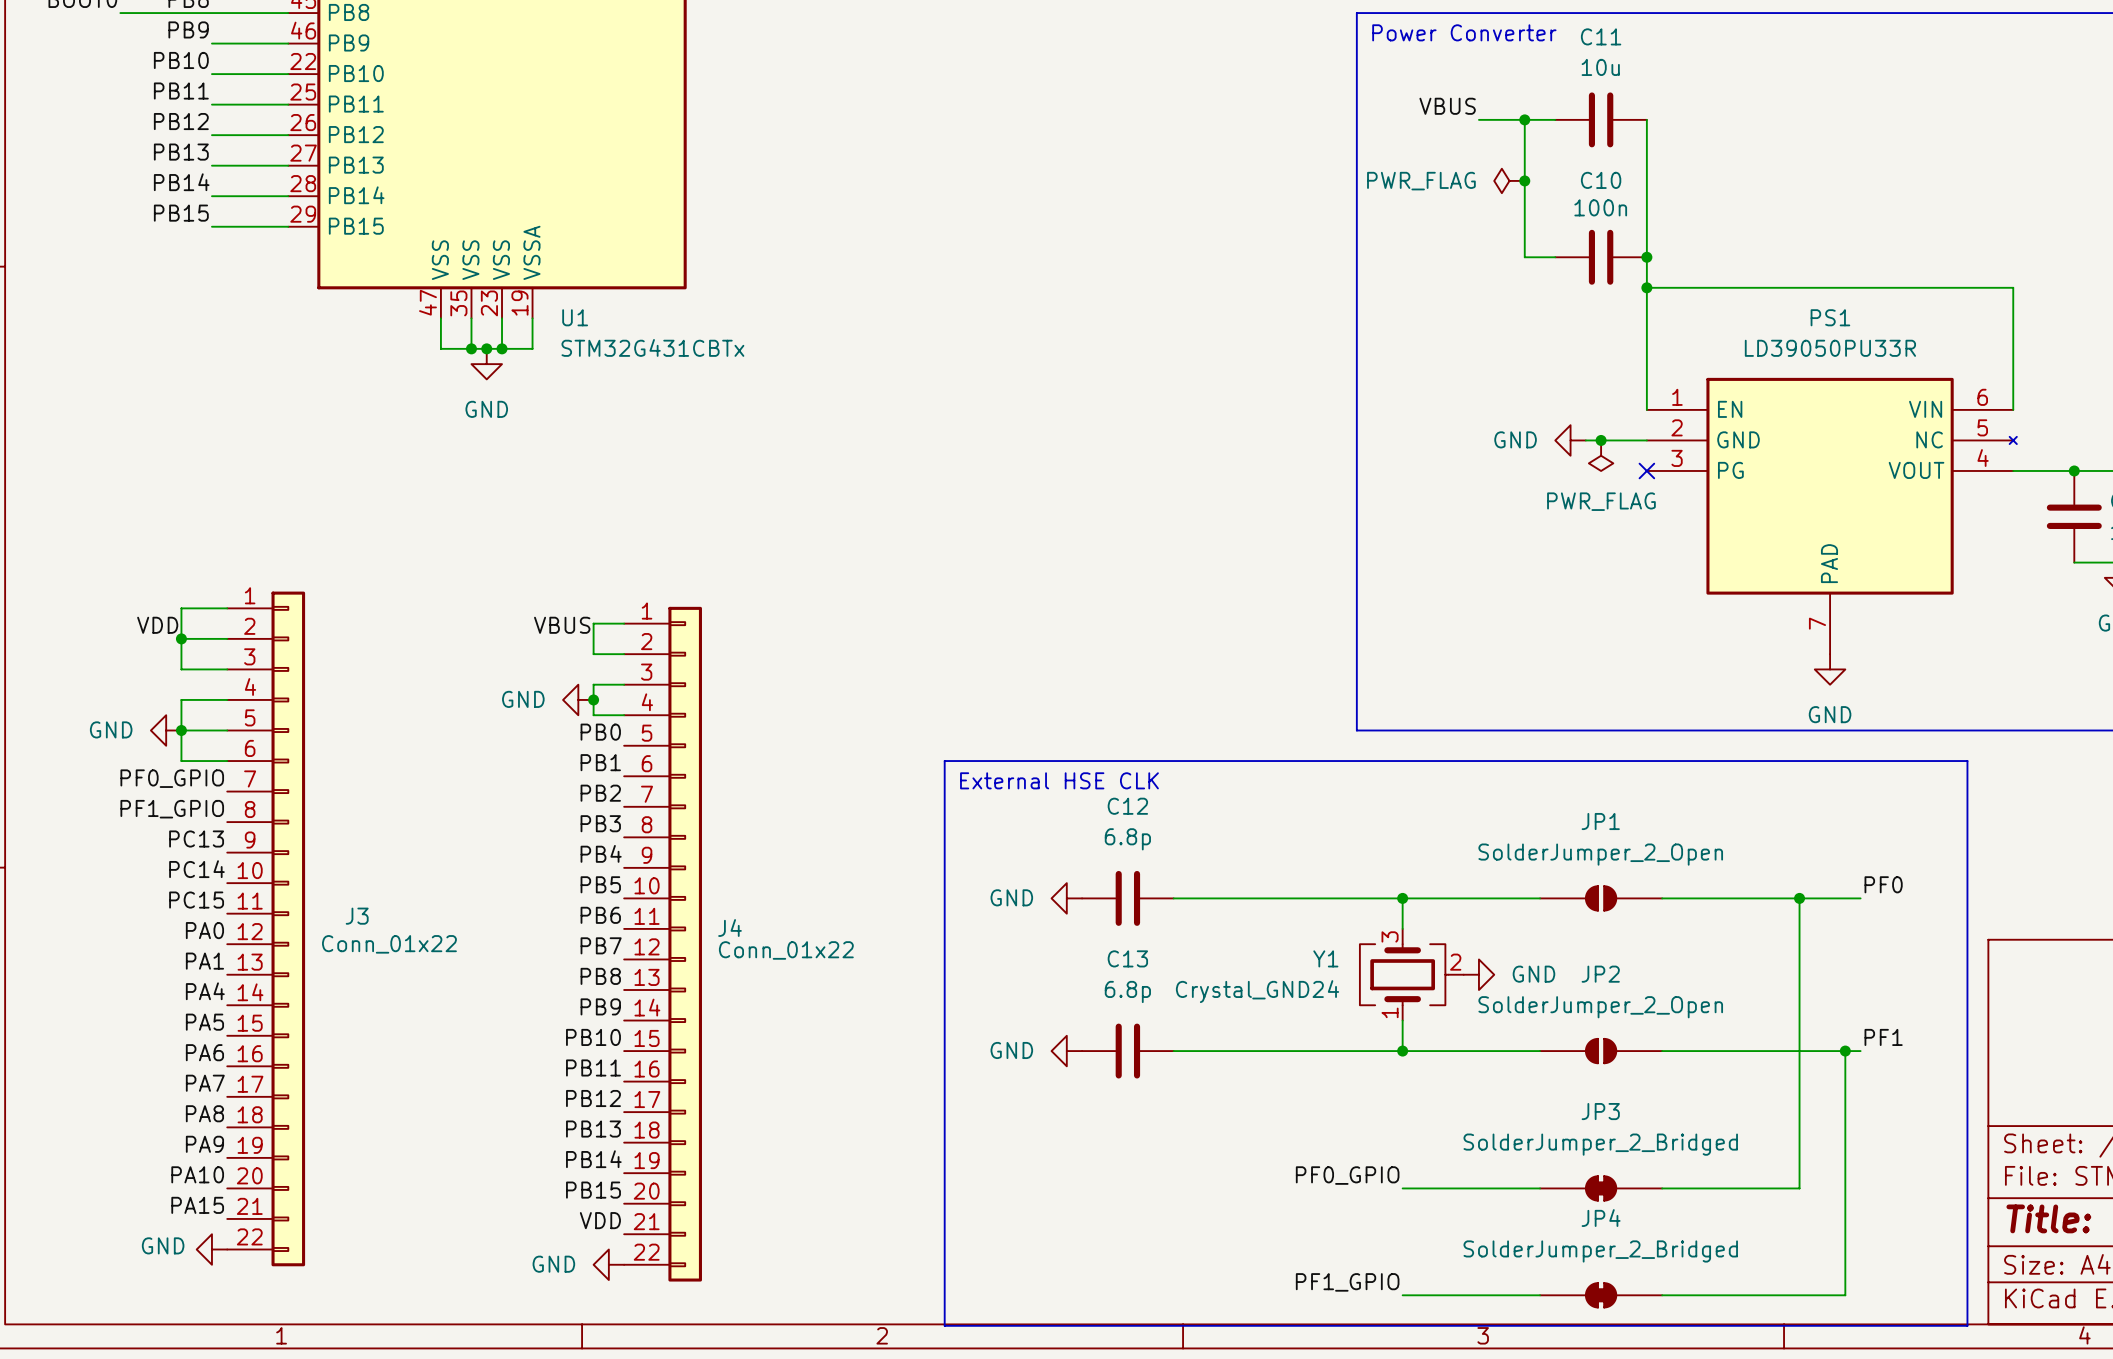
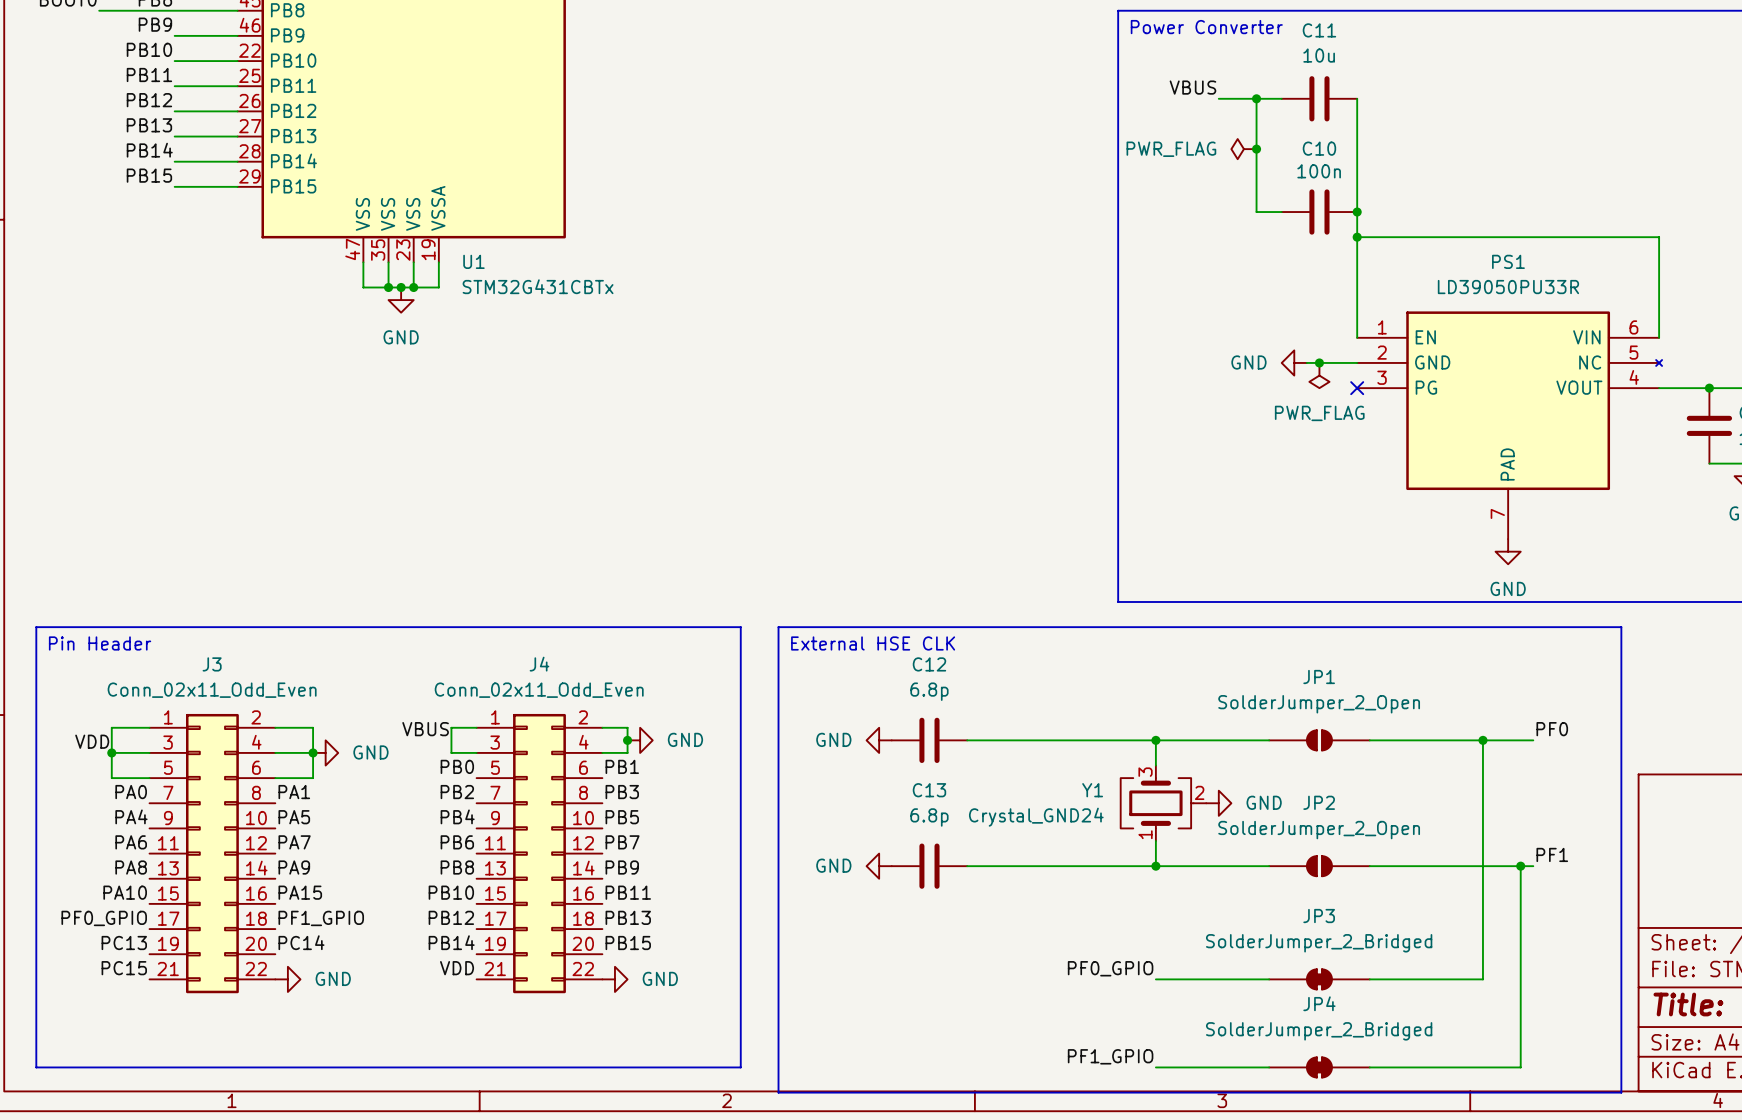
J3 symbol: [227, 591, 306, 1267] -> [149, 713, 276, 994]
J4 symbol: [624, 606, 702, 1282] -> [476, 713, 603, 994]
wire: (227, 608) (181, 608) (181, 669) (227, 669) -> none
wire: (624, 623) (593, 623) (593, 654) (624, 654) -> none
label position: VDD (157, 625) -> VDD (92, 741)
label position: VBUS (562, 625) -> VBUS (425, 729)
wire: (181, 638) (227, 638) -> none
junction: (181, 638) -> none
wire: (624, 684) (593, 684) (593, 715) (624, 715) -> (476, 727) (451, 727) (451, 752) (476, 752)
wire: (227, 699) (181, 699) (181, 761) (227, 761) -> (149, 727) (111, 727) (111, 778) (149, 778)
power symbol: GND (578, 699) -> none
junction: (593, 699) -> none
power symbol: GND (166, 730) -> none
wire: (181, 730) (227, 730) -> (111, 752) (149, 752)
junction: (181, 730) -> none
label position: PB0 (600, 732) -> PB0 (457, 766)
line: none -> (36, 627) (740, 627) (740, 1067) (36, 1067) (36, 627)
label position: PB1 (600, 762) -> PB1 (622, 766)
label: PF0_GPIO (172, 778) -> none
text: none -> Pin Header (100, 643)
label position: PB2 (600, 793) -> PB2 (457, 792)
label: PF1_GPIO (172, 809) -> none
label position: PB3 (600, 823) -> PB3 (622, 792)
label: PC13 (196, 838) -> none
label position: PB4 (601, 853) -> PB4 (457, 816)
label position: PC14 (196, 869) -> PC14 (301, 942)
wire: none -> (275, 727) (313, 727) (313, 778) (275, 778)
wire: none -> (602, 727) (627, 727) (627, 752) (602, 752)
label position: PB5 (600, 884) -> PB5 (622, 817)
junction: none -> (627, 740)
power symbol: none -> GND (640, 740)
label position: PC15 (196, 900) -> PC15 (124, 968)
junction: none -> (111, 752)
wire: none -> (275, 752) (313, 752)
junction: none -> (313, 752)
power symbol: none -> GND (325, 752)
label position: PB6 (600, 915) -> PB6 (457, 842)
J3 name position: J3 (357, 916) -> J3 (212, 664)
J4 name position: J4 (730, 928) -> J4 (539, 664)
label position: PA0 (204, 930) -> PA0 (131, 792)
J3 value: Conn_01x22 (389, 944) -> Conn_02x11_Odd_Even (212, 690)
label position: PB7 (601, 945) -> PB7 (622, 842)
J4 value: Conn_01x22 (786, 950) -> Conn_02x11_Odd_Even (539, 690)
label position: PA1 (204, 961) -> PA1 (294, 792)
label position: PB8 (600, 976) -> PB8 (457, 867)
label position: PA4 (205, 991) -> PA4 (131, 816)
label position: PB9 (600, 1006) -> PB9 (622, 867)
label position: PA5 (204, 1022) -> PA5 (294, 817)
label position: PB10 (593, 1037) -> PB10 (451, 892)
label position: PA6 (204, 1052) -> PA6 (131, 842)
label position: PB11 (593, 1067) -> PB11 (628, 892)
label position: PA7 (205, 1083) -> PA7 (294, 842)
label position: PB12 (593, 1098) -> PB12 (451, 917)
label position: PA8 (204, 1113) -> PA8 (131, 867)
label: none -> PF0_GPIO (104, 918)
label: none -> PF1_GPIO (321, 918)
label position: PB13 (593, 1129) -> PB13 (628, 917)
label: none -> PC13 (124, 943)
label position: PA9 (204, 1144) -> PA9 (294, 867)
label position: PB14 (593, 1159) -> PB14 (451, 942)
label position: PA10 (197, 1174) -> PA10 (125, 892)
power symbol: none -> GND (287, 979)
power symbol: none -> GND (614, 979)
label position: PB15 (593, 1190) -> PB15 (628, 943)
label position: PA15 (197, 1205) -> PA15 (300, 892)
label position: VDD (600, 1220) -> VDD (457, 968)
power symbol: GND (211, 1249) -> none
power symbol: GND (608, 1264) -> none

